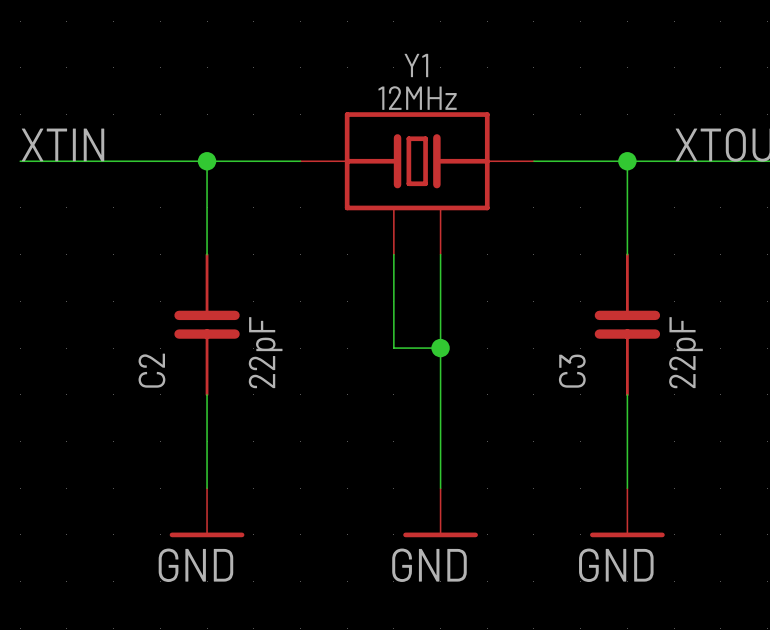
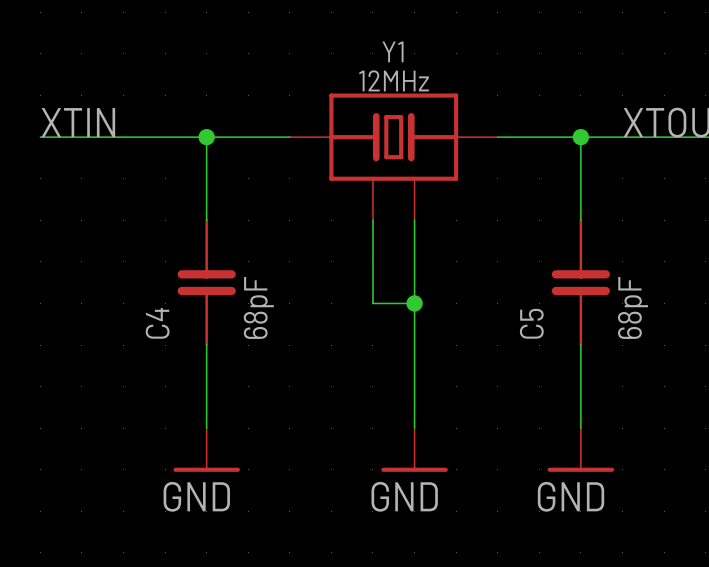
C2 value: 22pF (265, 352) -> 68pF (258, 307)
C3 value: 22pF (685, 352) -> 68pF (632, 307)
C2 name: C2 (151, 370) -> C4 (157, 323)
C3 name: C3 (572, 371) -> C5 (531, 323)

